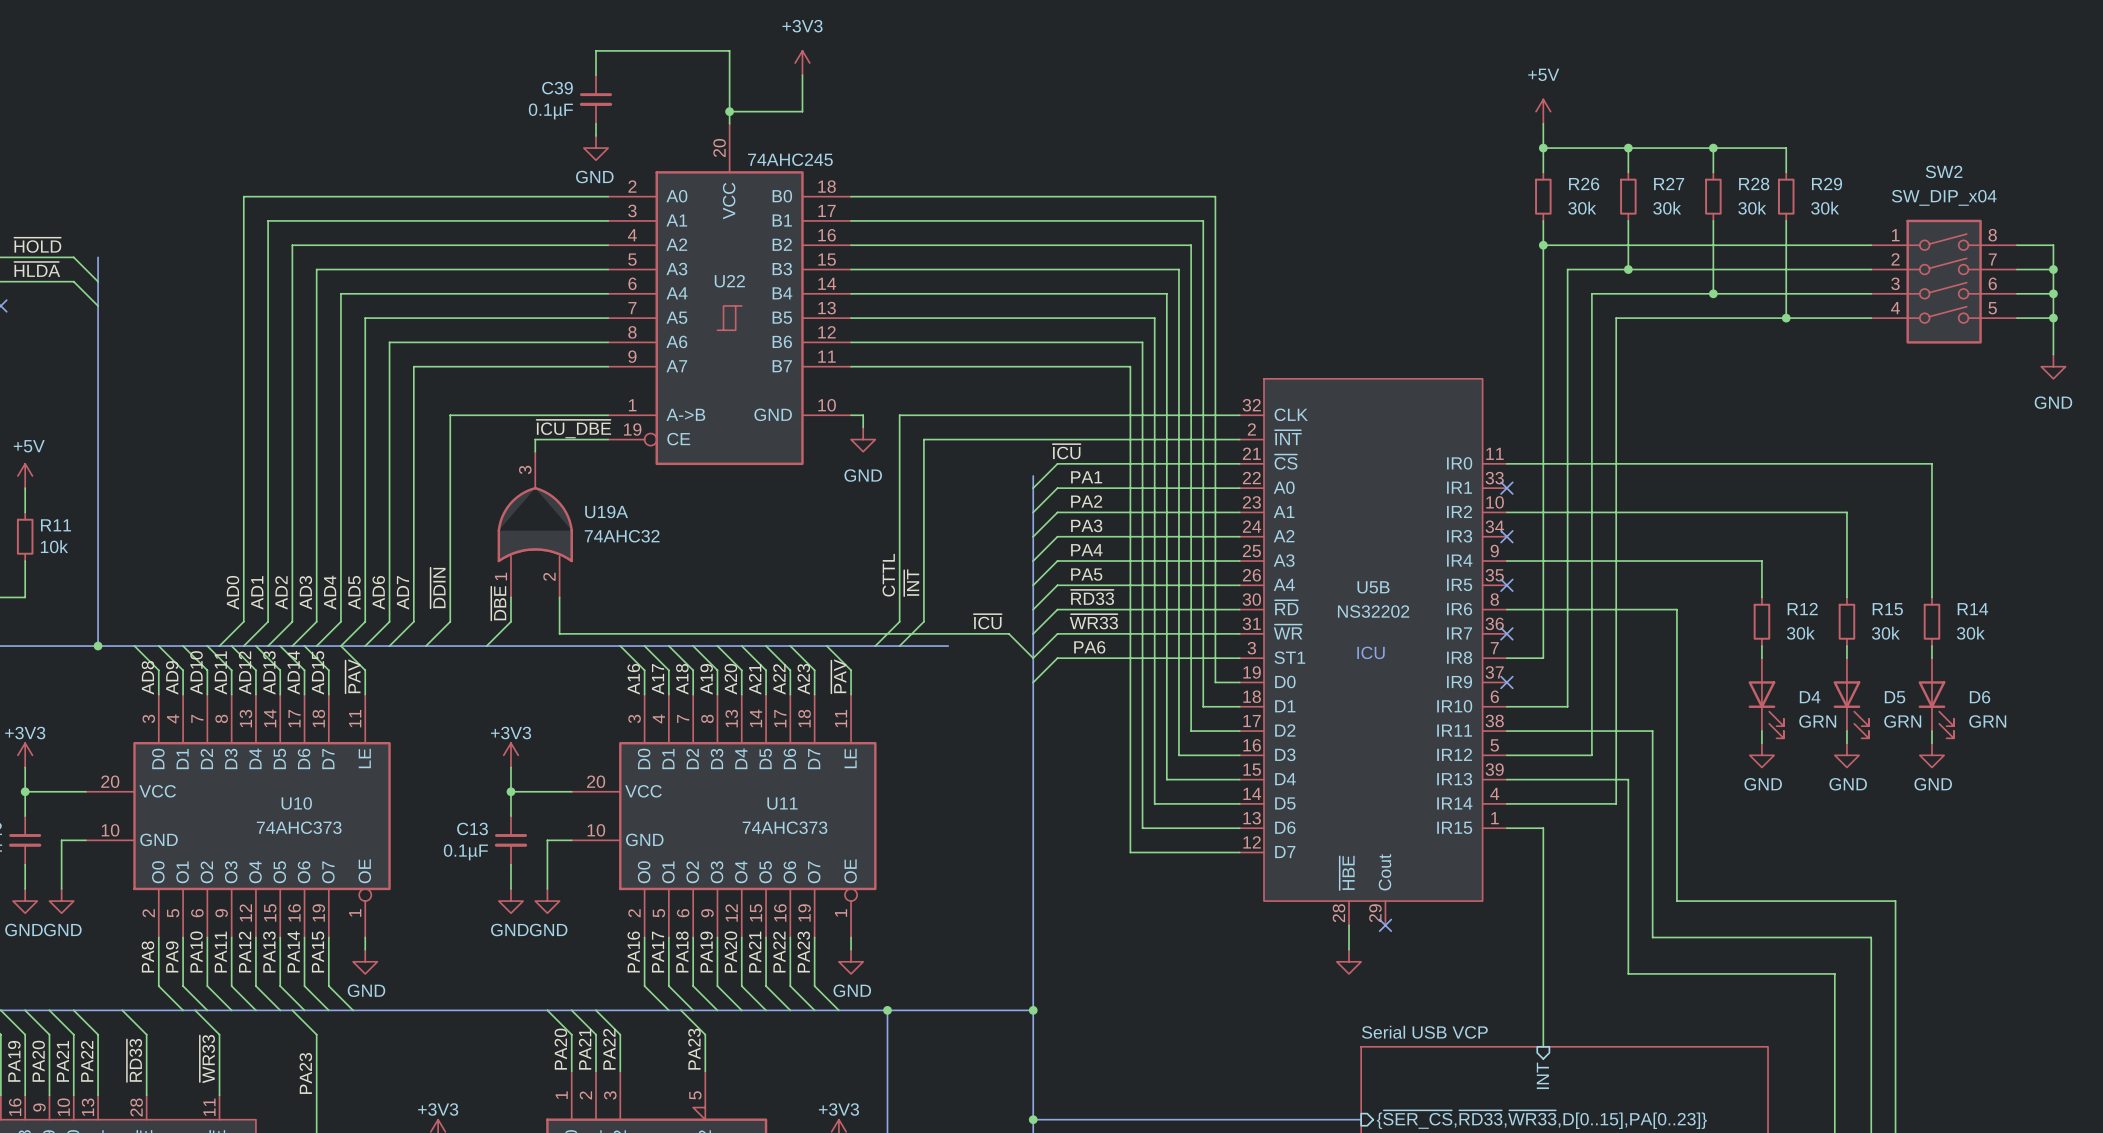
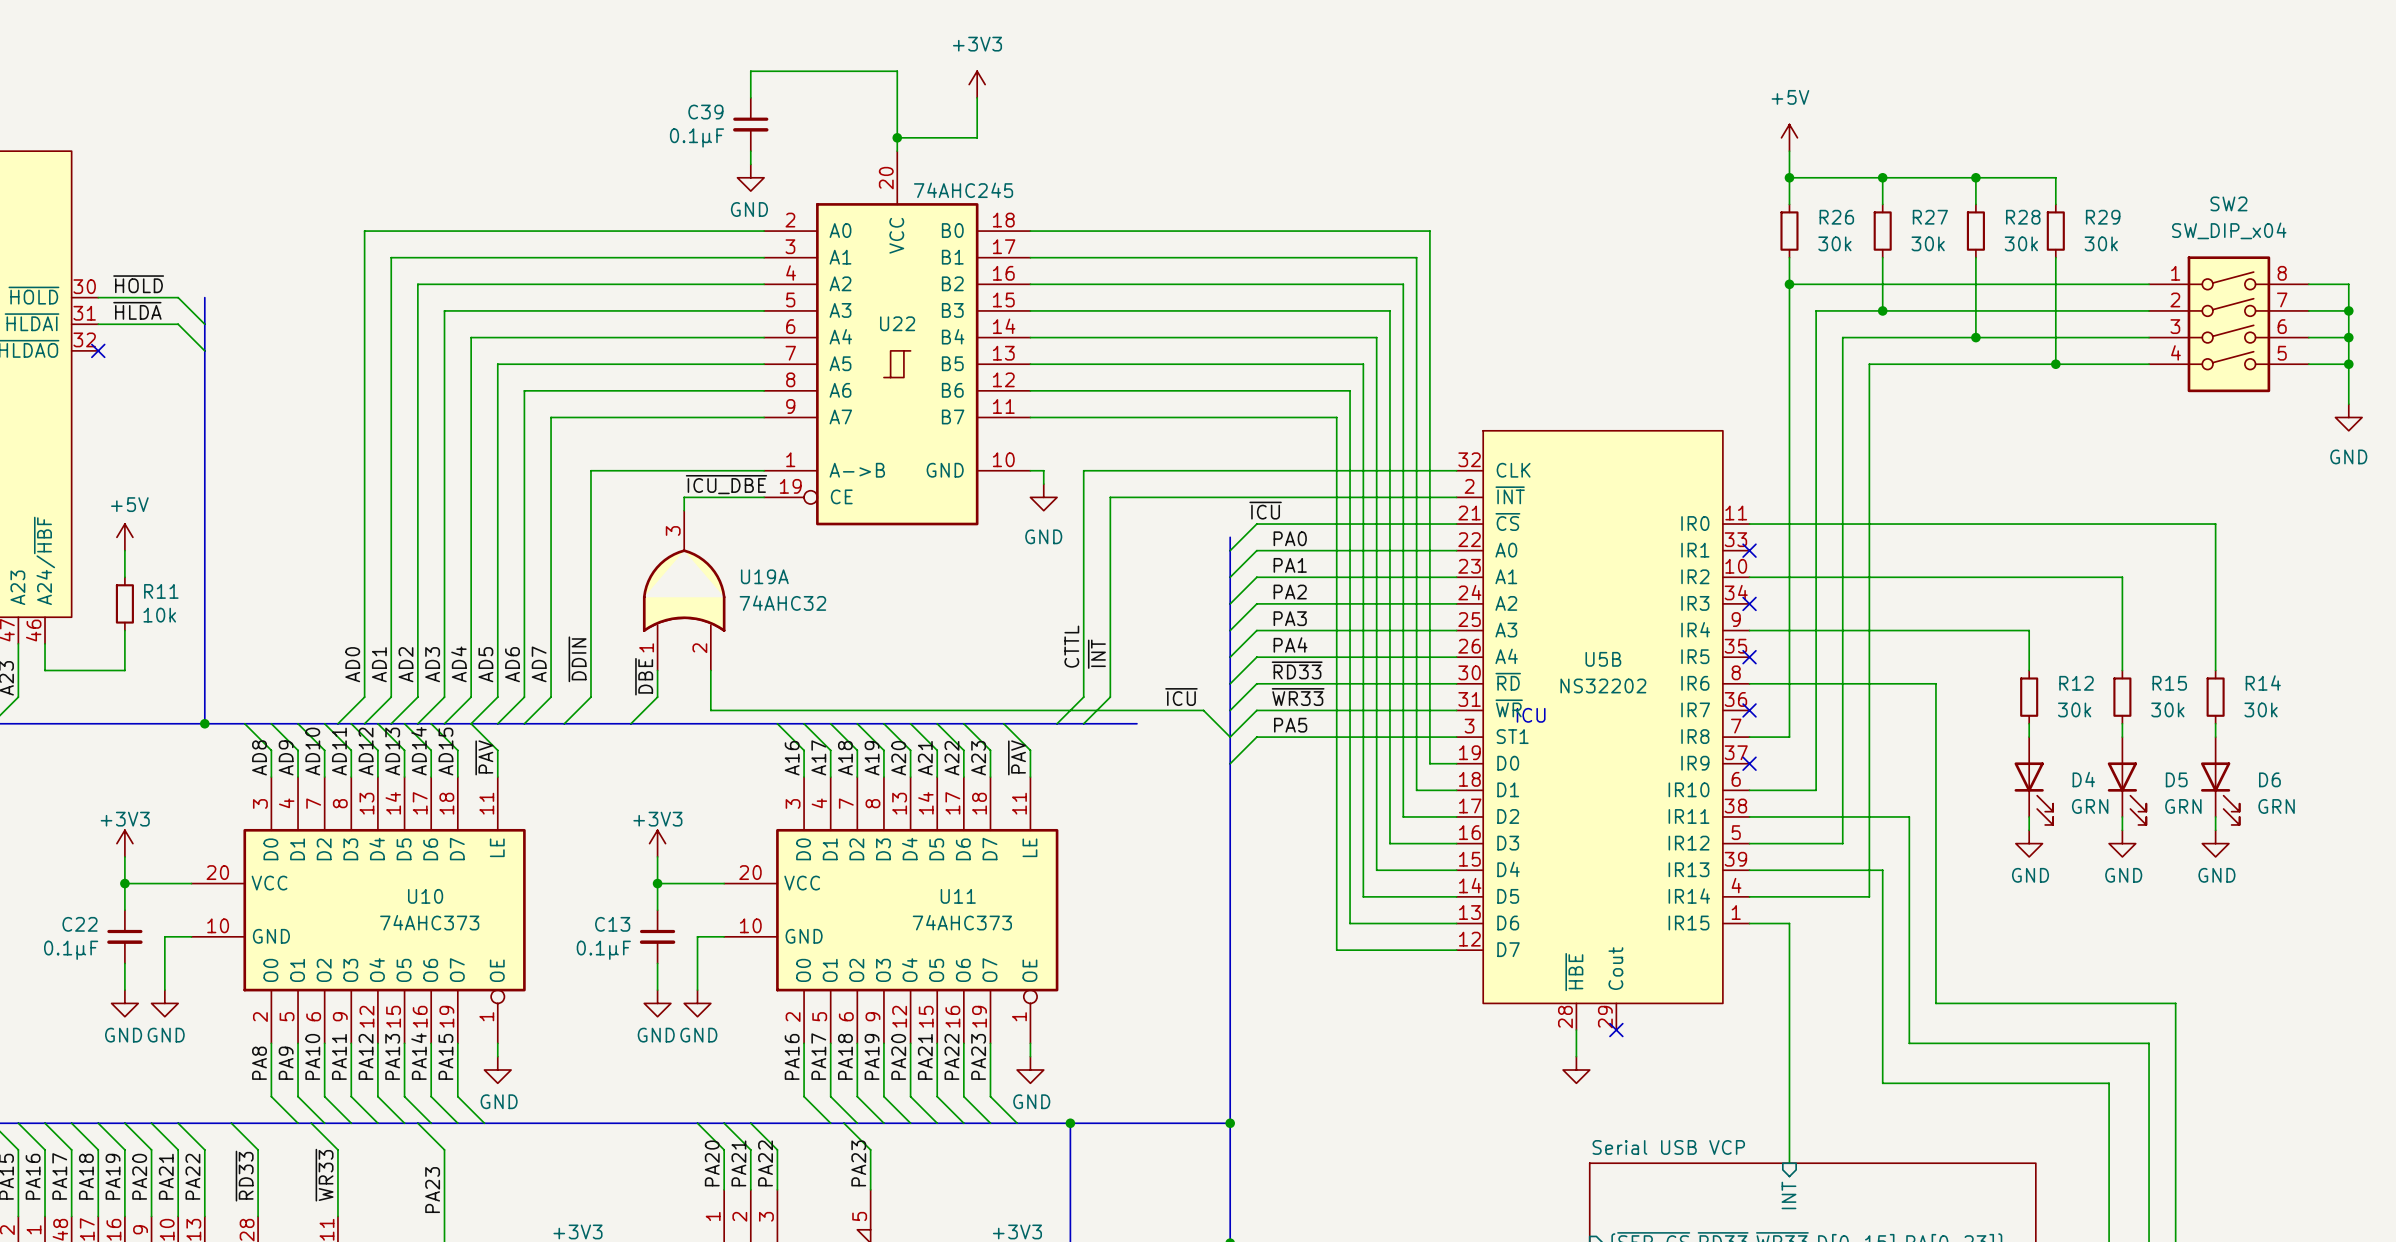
label: PA1 (1086, 477) -> PA0 (1290, 538)
label: PA2 (1086, 501) -> PA1 (1290, 565)
label: PA3 (1086, 525) -> PA2 (1290, 592)
label: PA4 (1086, 550) -> PA3 (1290, 618)
label: PA5 (1086, 574) -> PA4 (1290, 644)
label: PA6 (1089, 647) -> PA5 (1290, 725)
text position: ICU (1371, 652) -> ICU (1531, 715)

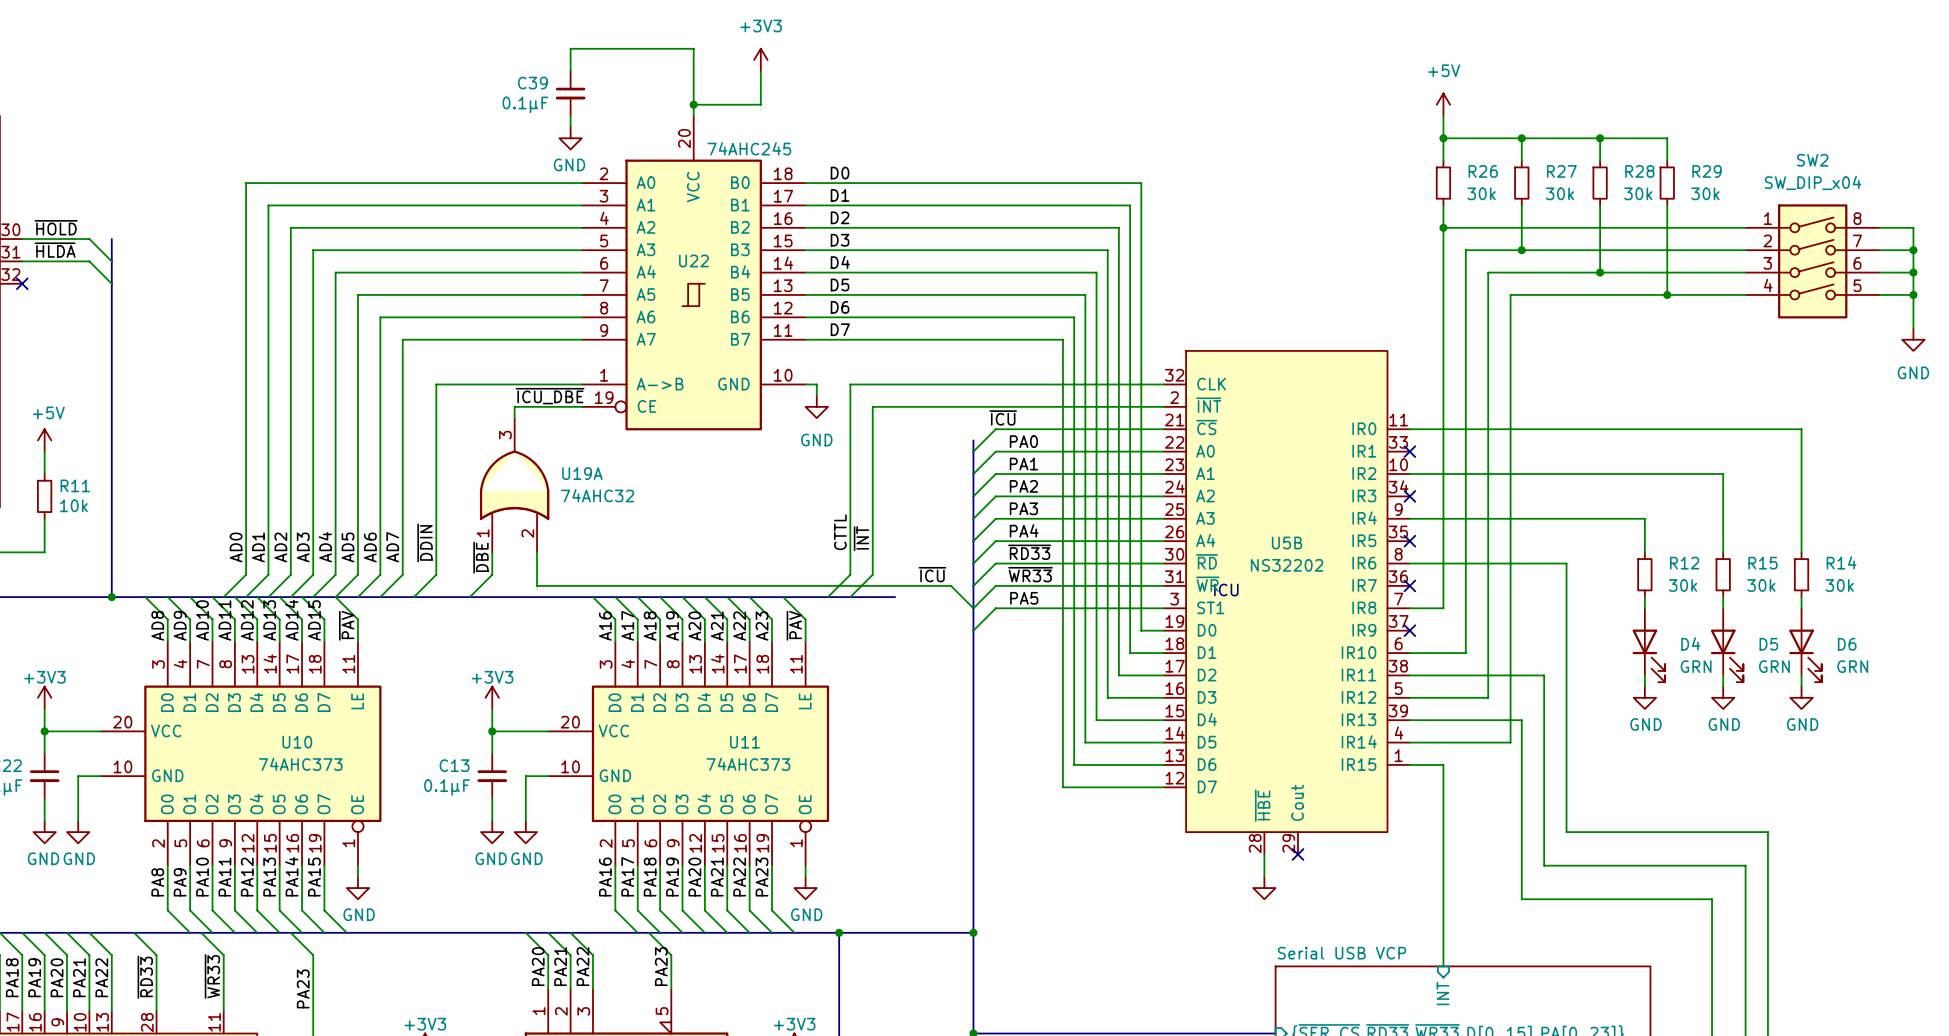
label: none -> D0 (840, 173)
label: none -> D1 (840, 195)
label: none -> D2 (840, 217)
label: none -> D3 (840, 240)
label: none -> D4 (840, 262)
label: none -> D5 (840, 284)
label: none -> D6 (840, 307)
label: none -> D7 (840, 329)

